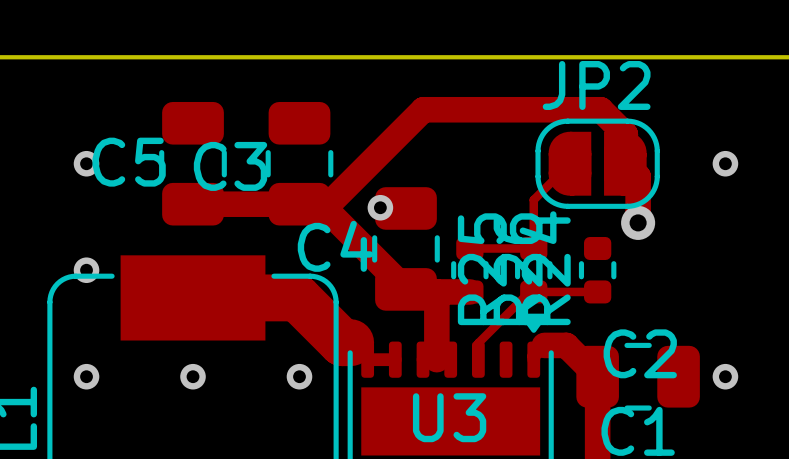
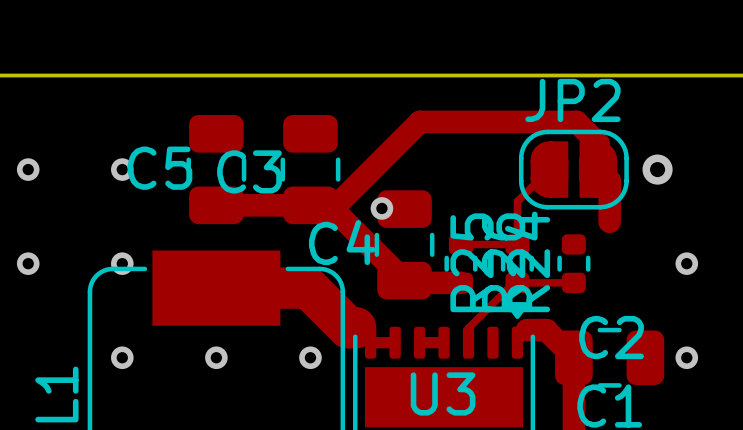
via: (725, 163) -> none
via position: (638, 222) -> (657, 169)
via: none -> (686, 263)
top track: (436, 291) (436, 359) -> none

